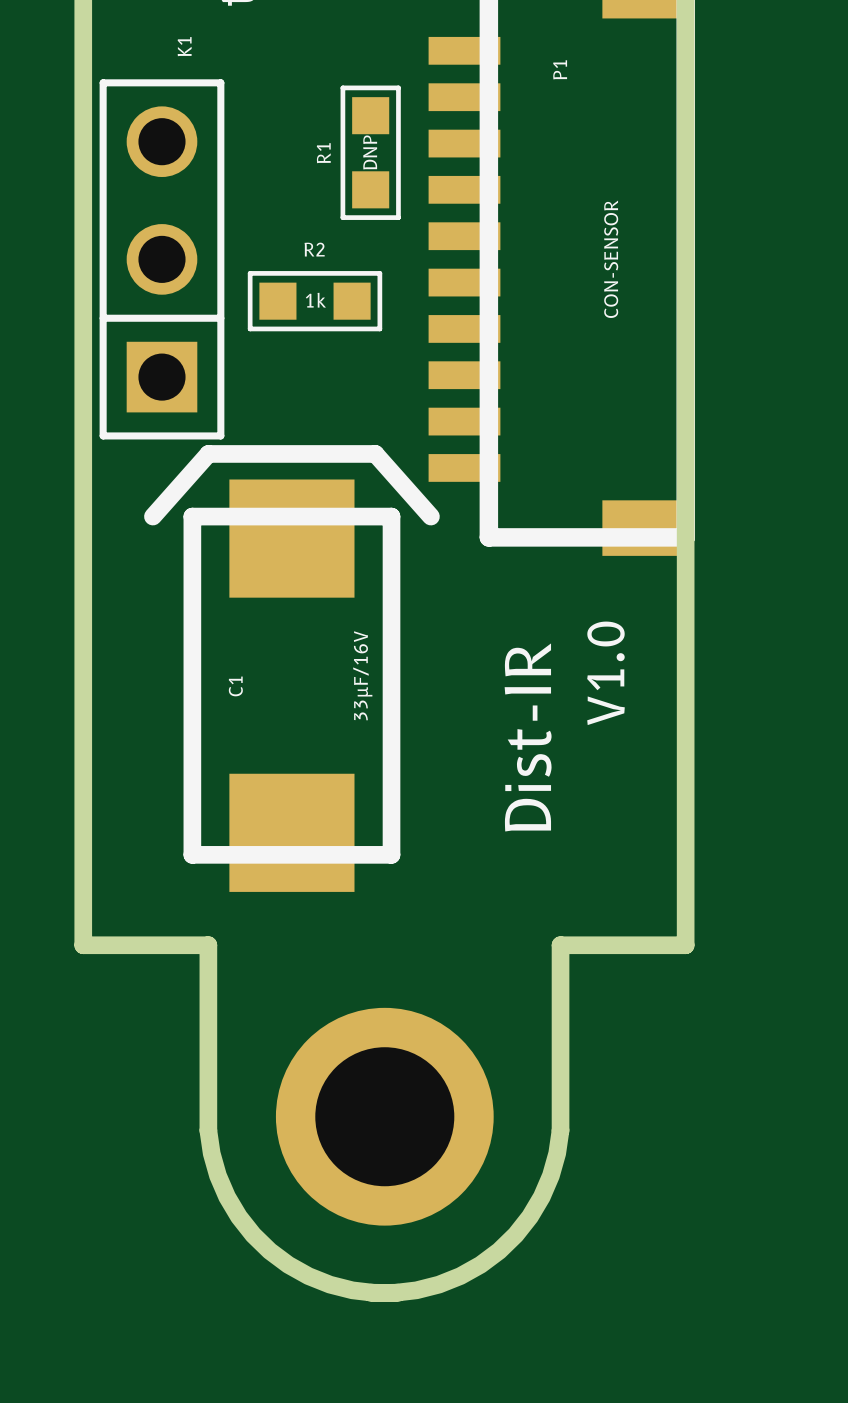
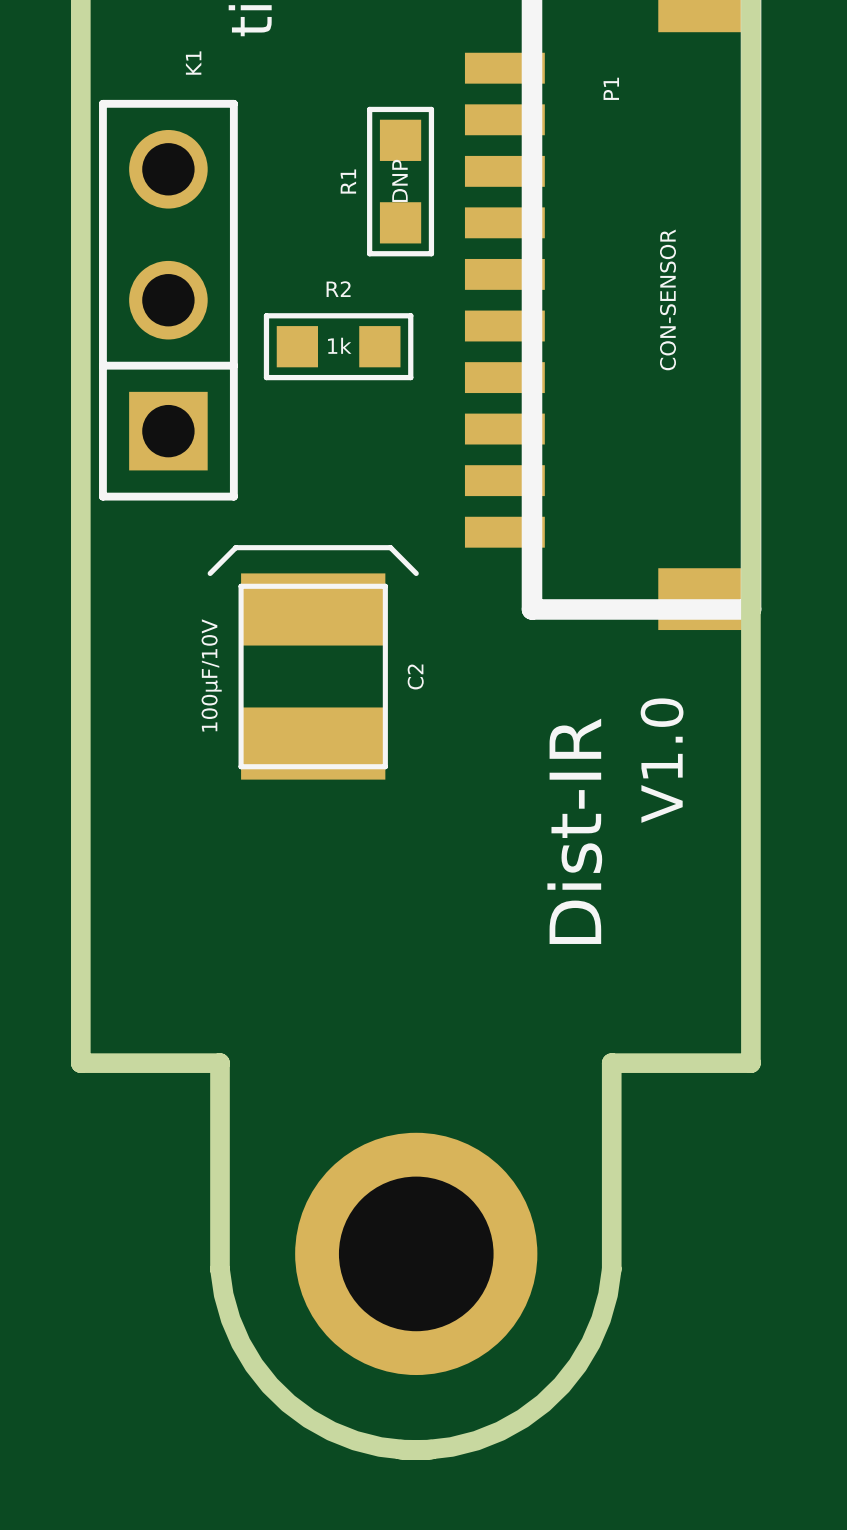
C2: none -> 100µF/10V (313, 662)
C1: 33µF/16V (291, 668) -> none

